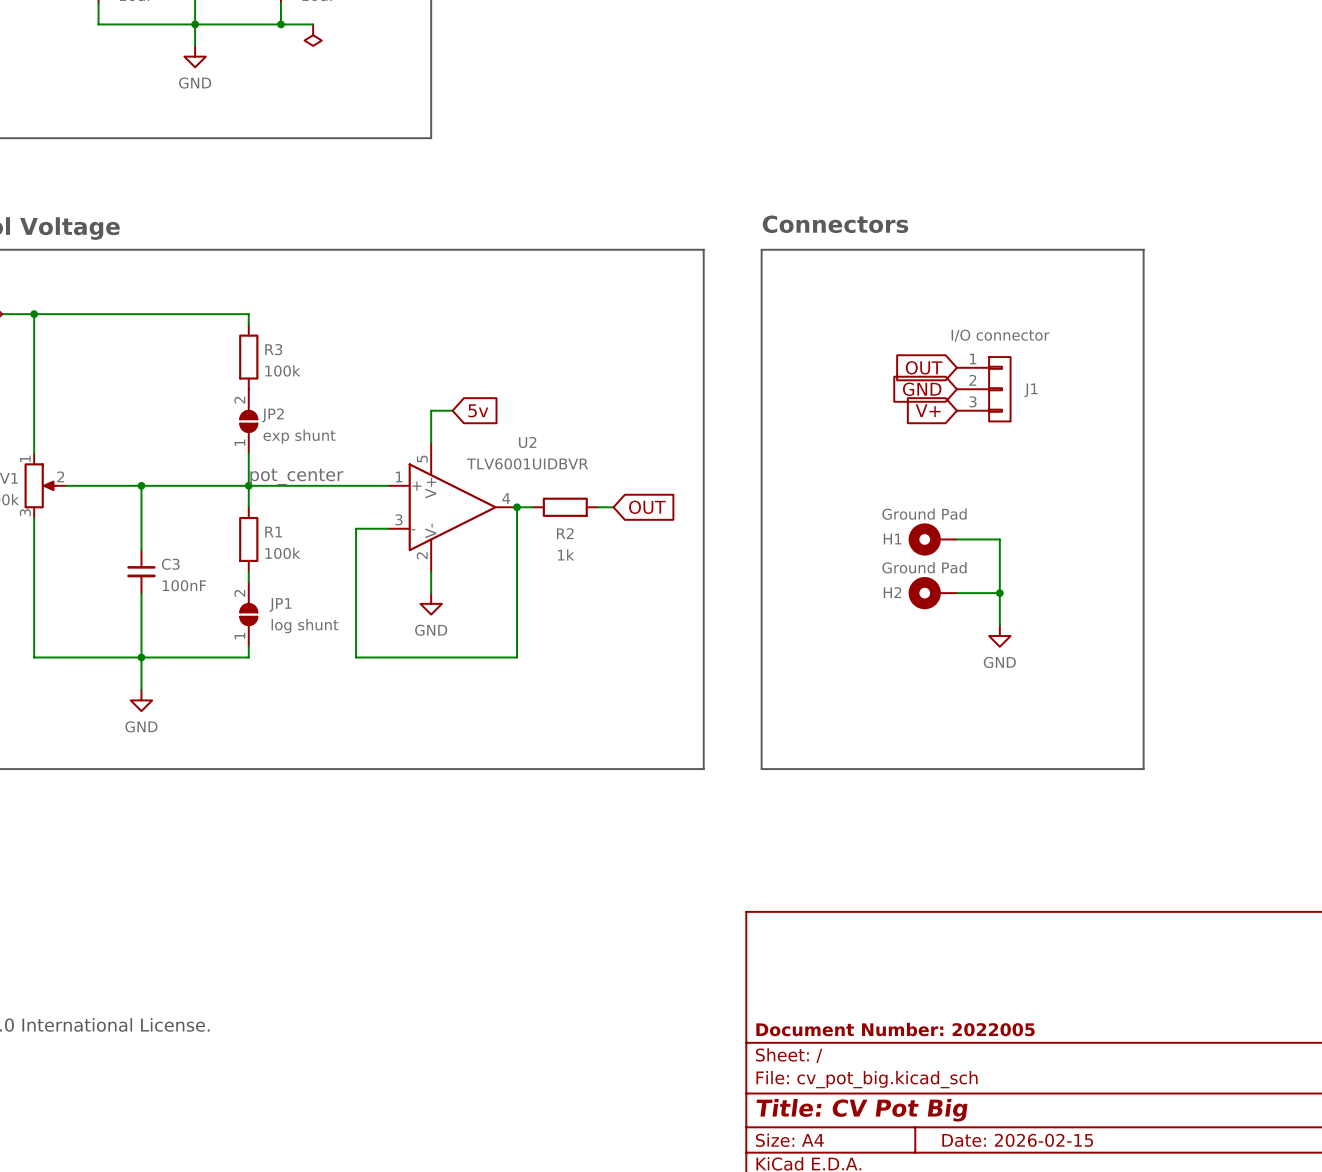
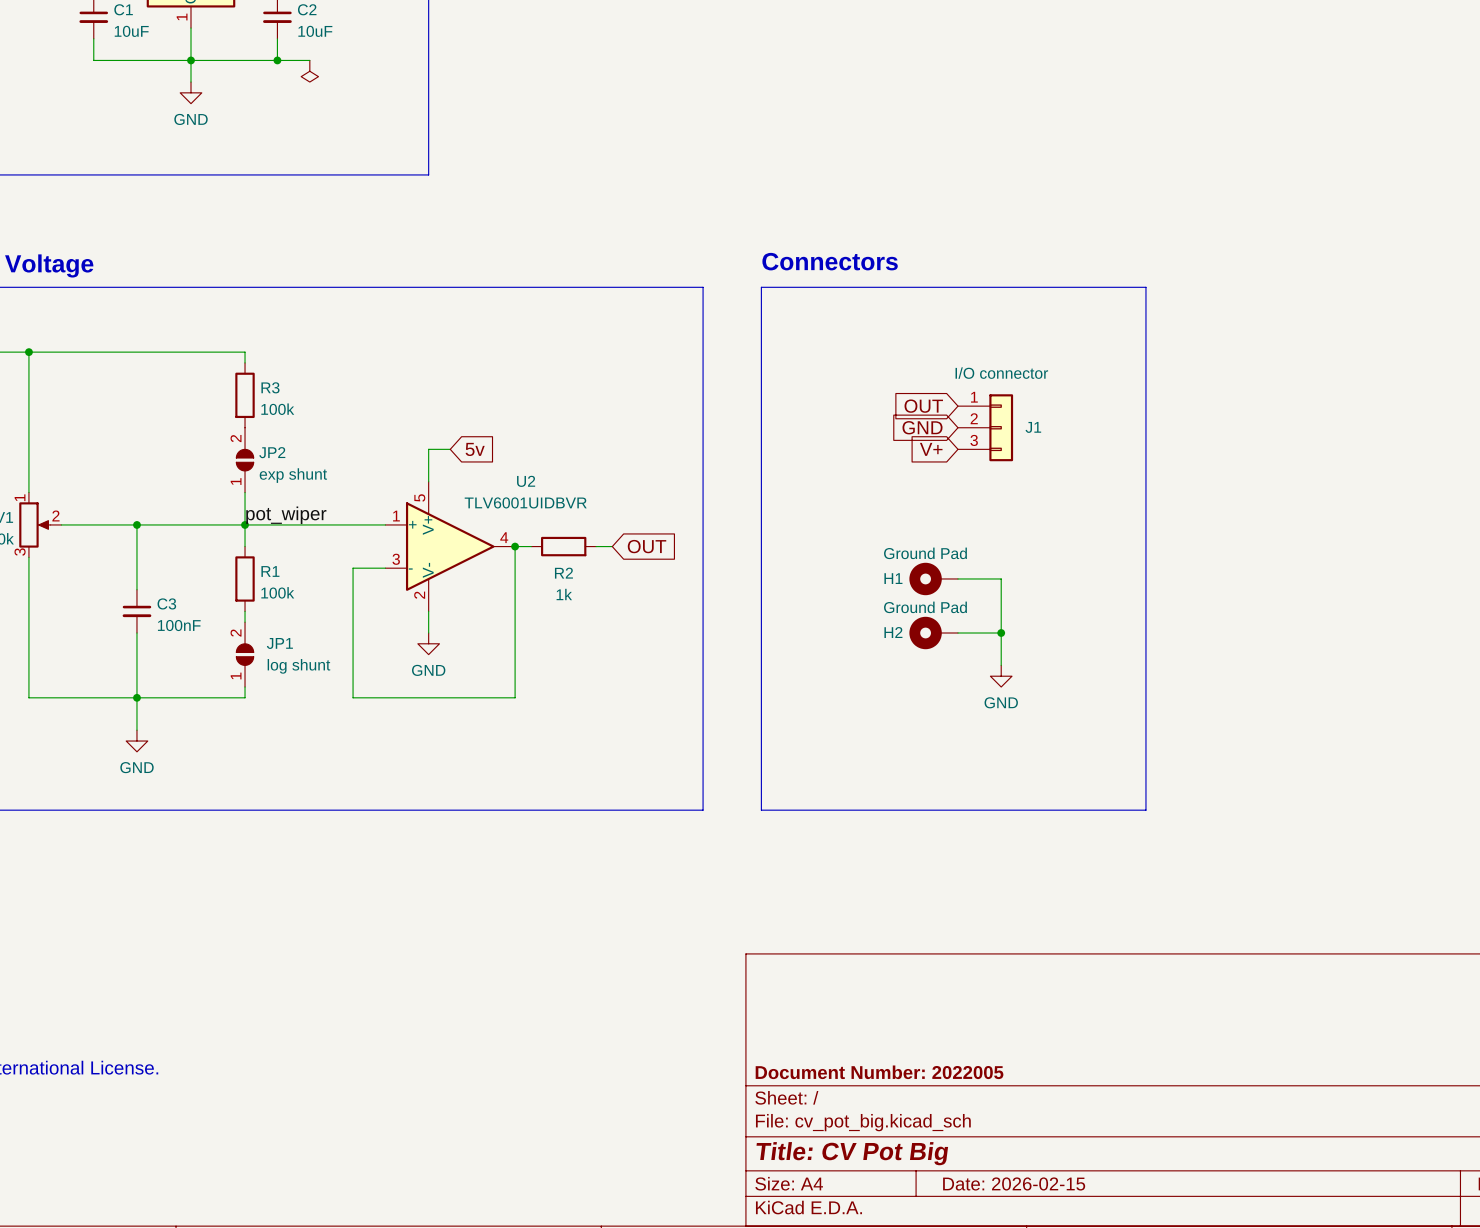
J1 symbol: [956, 357, 1011, 422] -> [958, 394, 1014, 462]
label: pot_center (296, 476) -> pot_wiper (286, 515)

